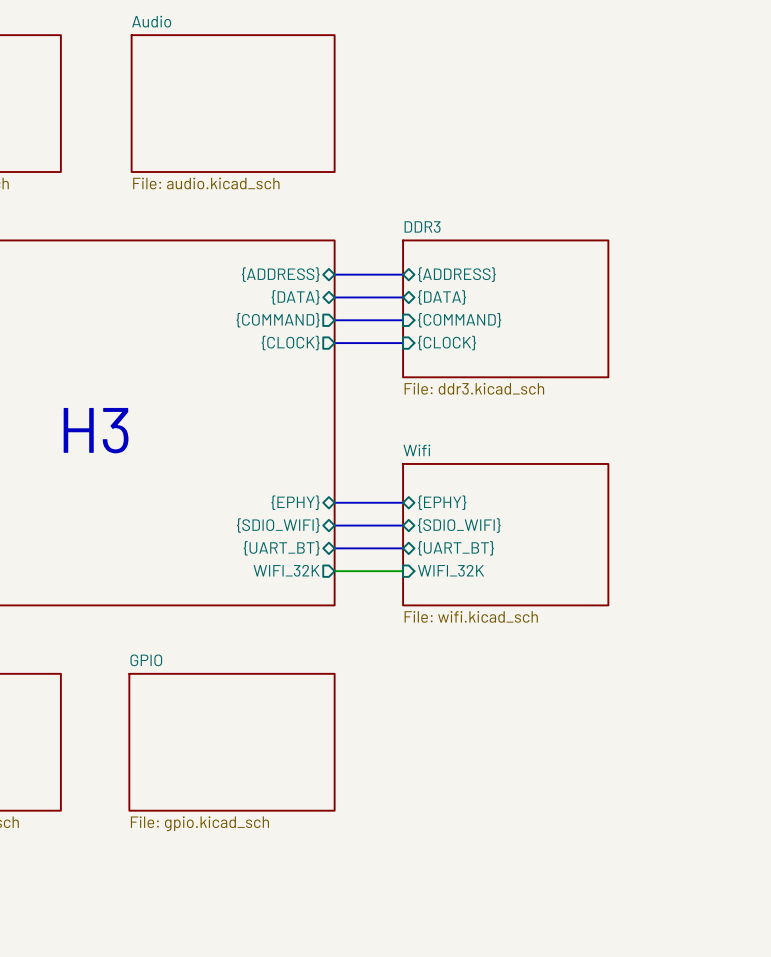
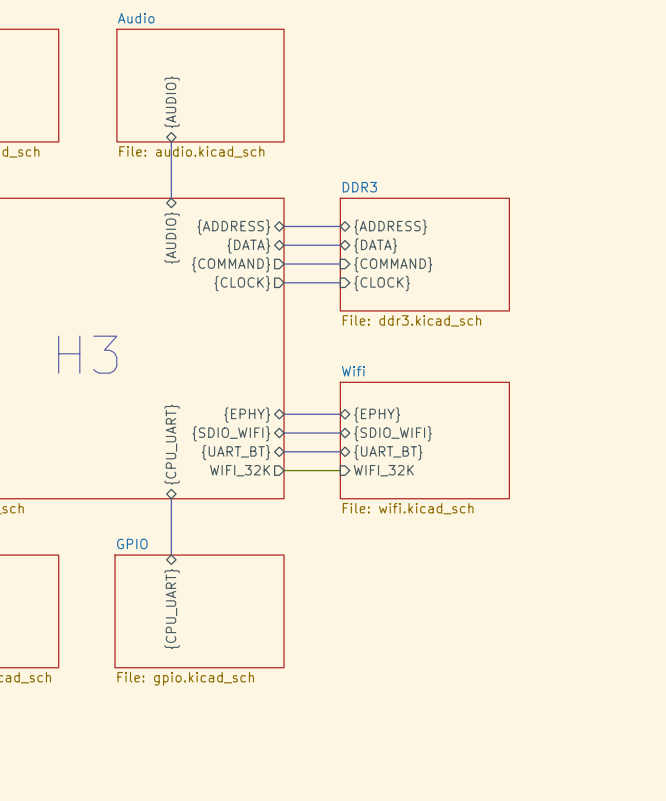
sheet pin: none -> {AUDIO} (172, 102)
bus: none -> (171, 141) (171, 198)
sheet pin: none -> {AUDIO} (172, 238)
sheet pin: none -> {CPU_UART} (172, 444)
bus: none -> (171, 498) (171, 555)
sheet pin: none -> {CPU_UART} (172, 609)

